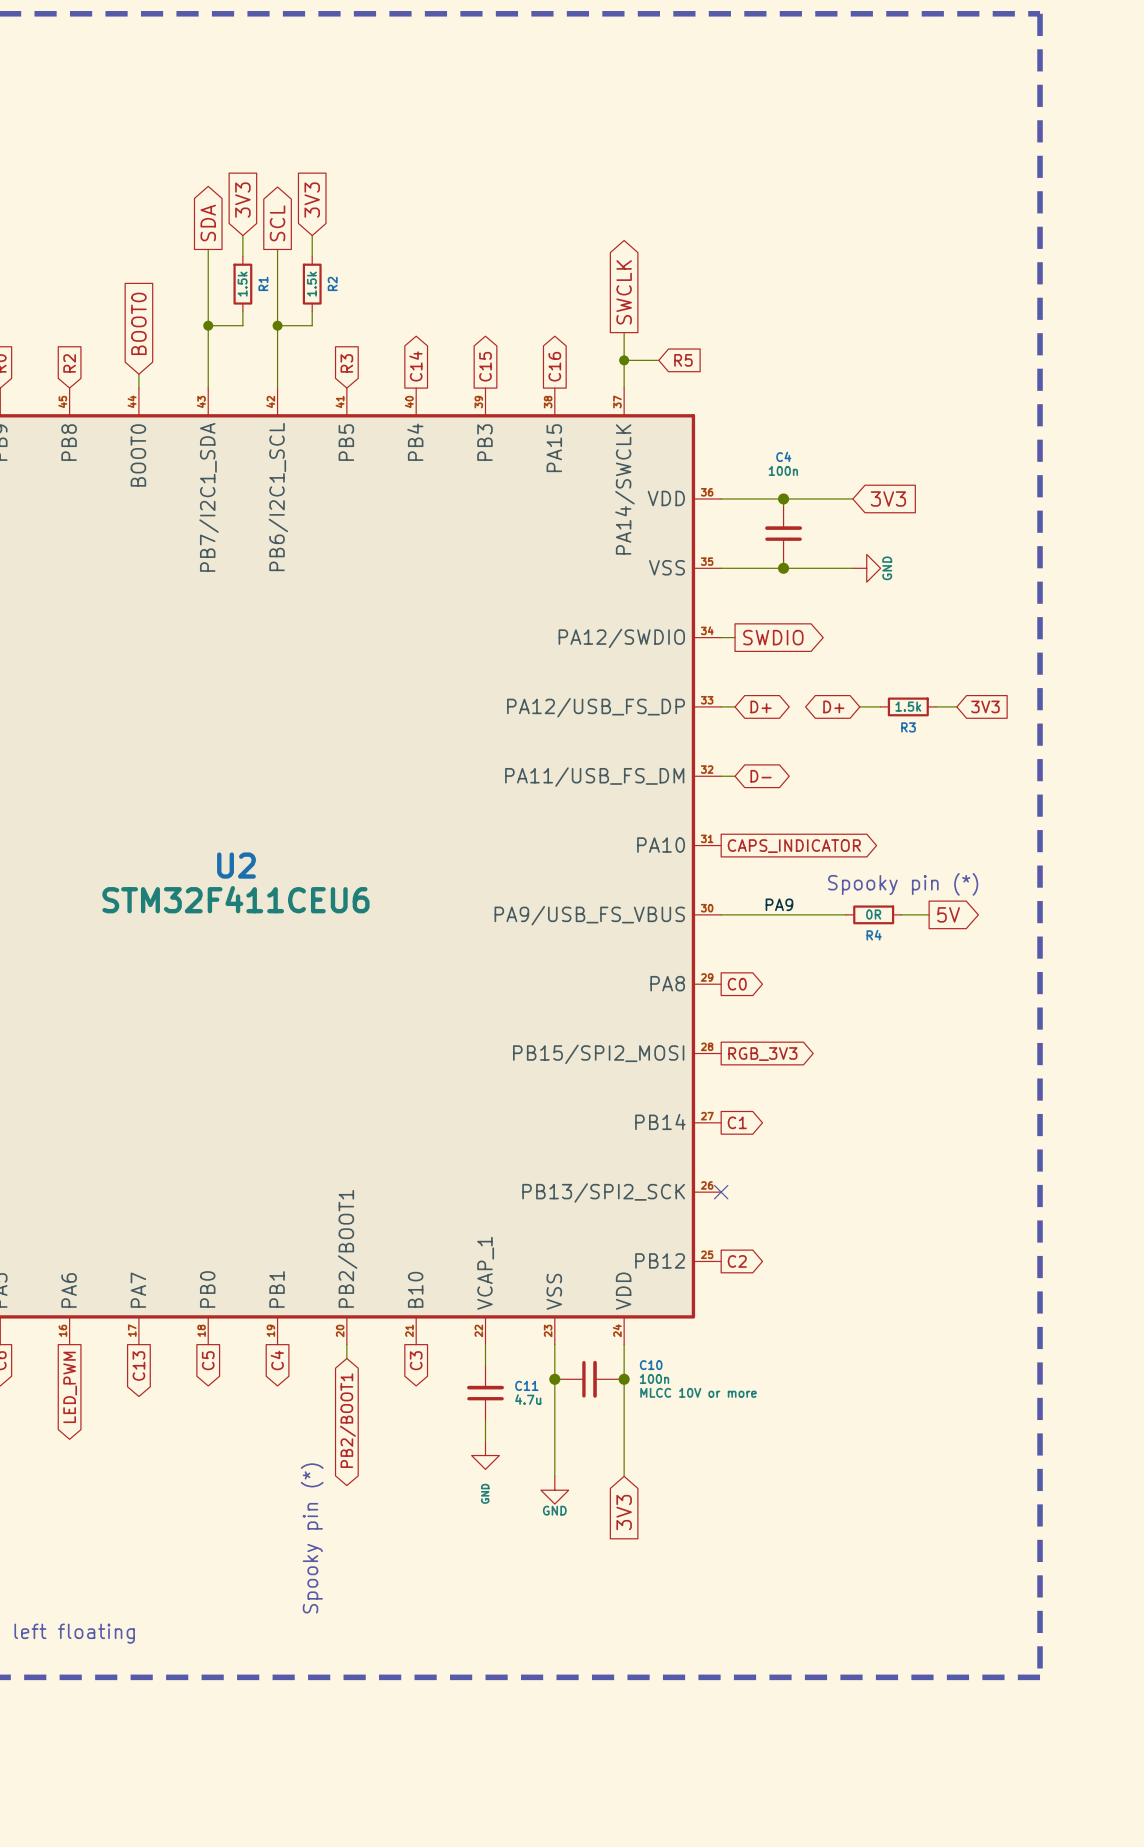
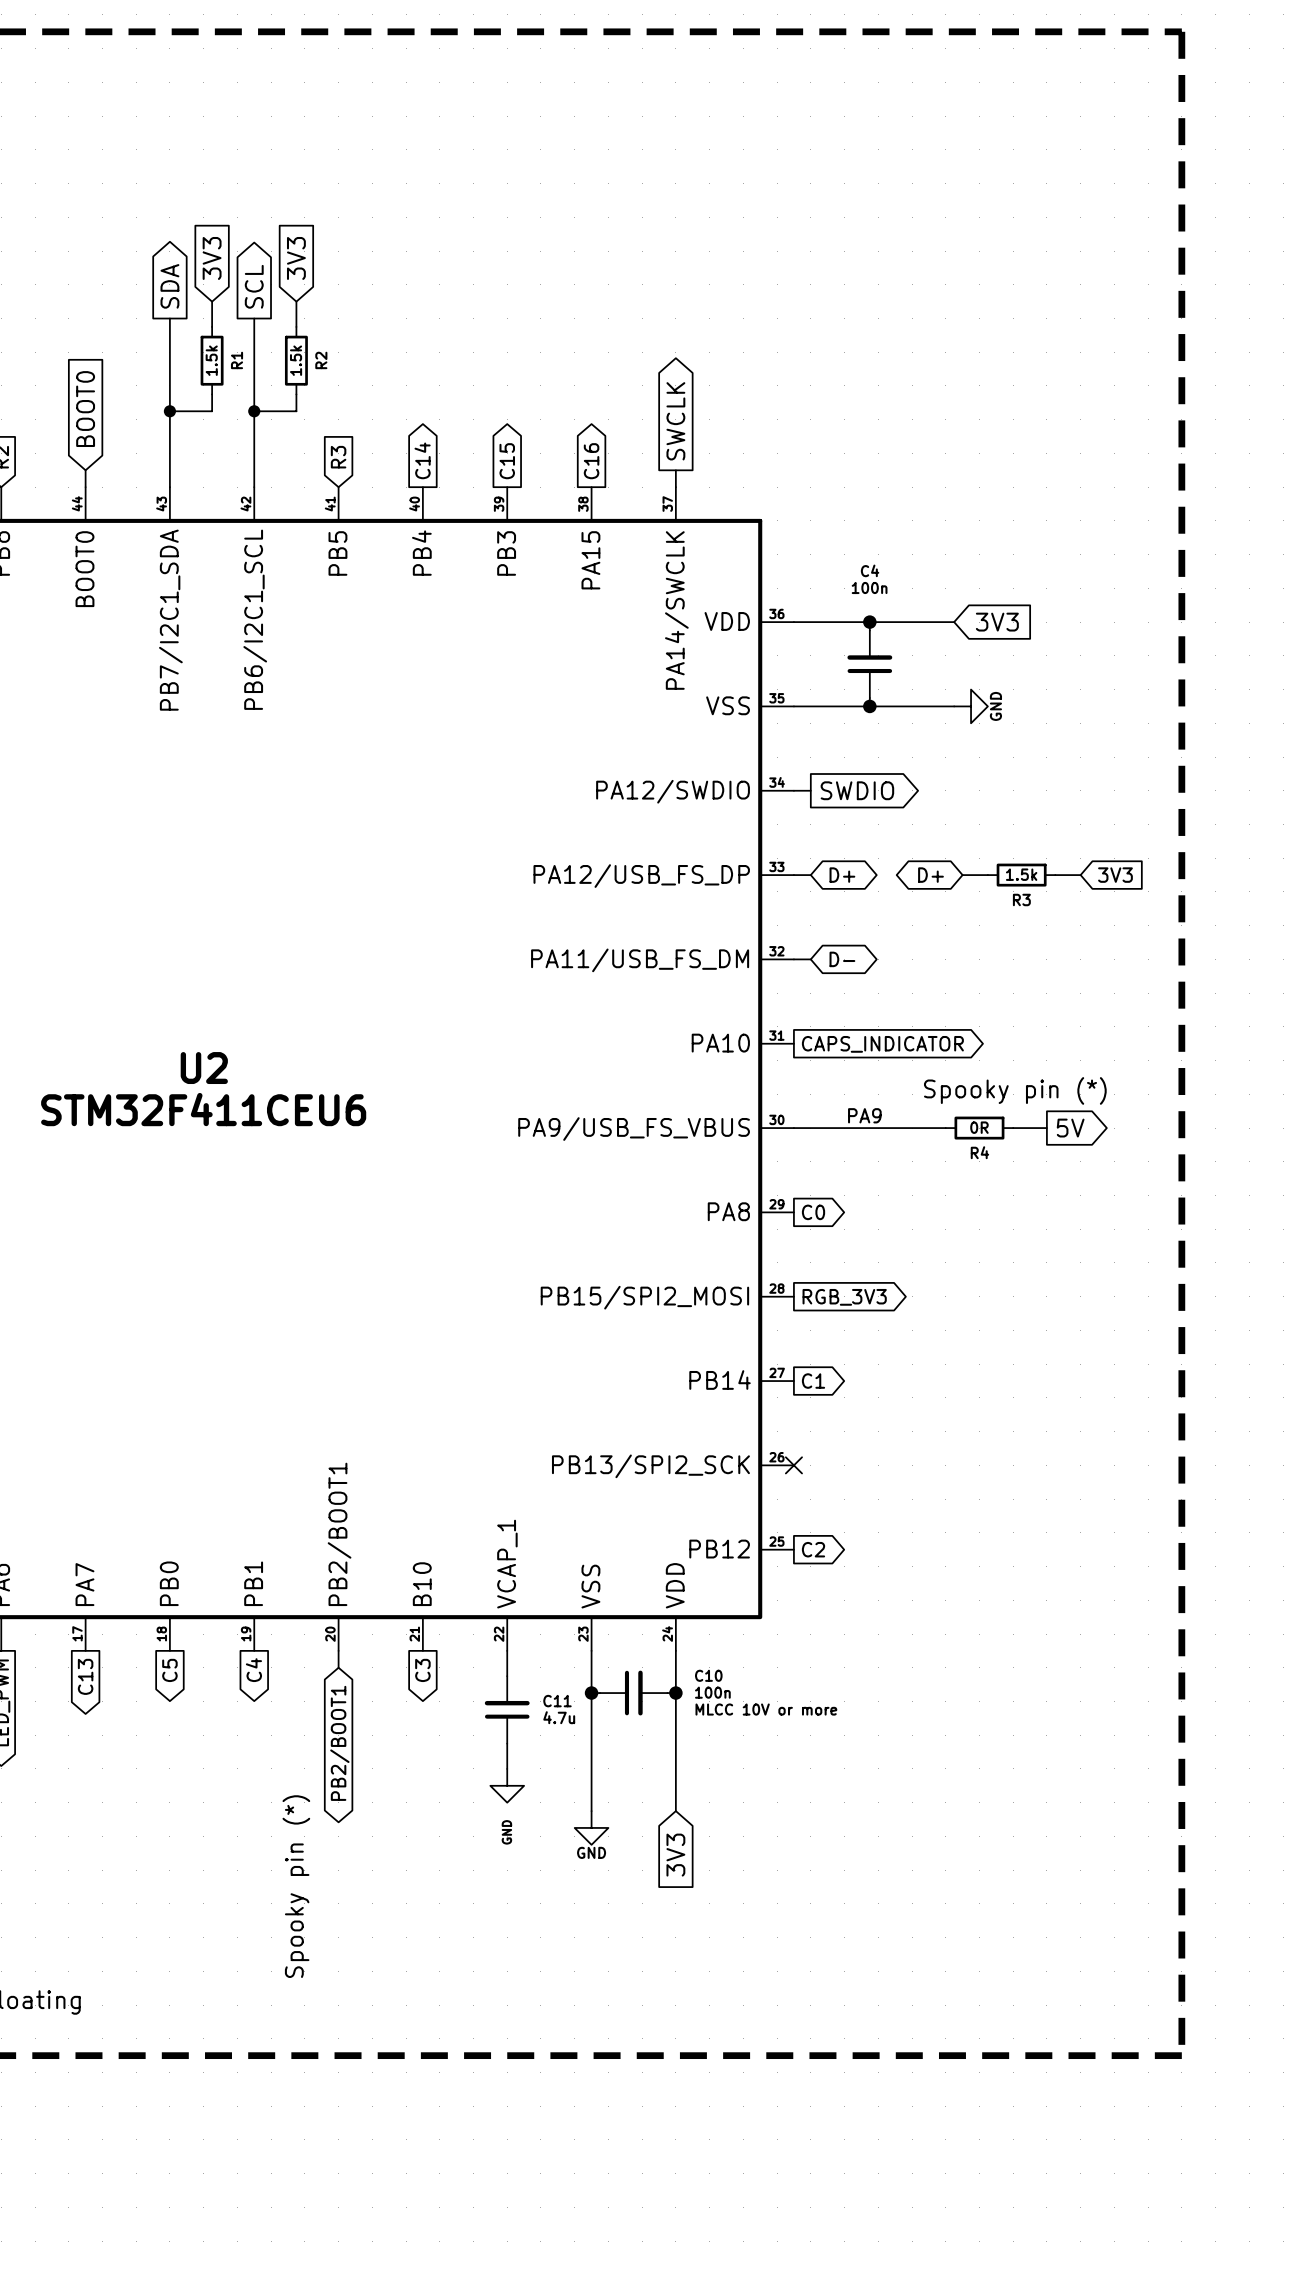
global label position: SWCLK (624, 292) -> SWCLK (675, 421)
wire: (624, 332) (624, 374) -> none
wire: (624, 360) (658, 360) -> none
junction: (624, 360) -> none
global label: R5 (683, 360) -> none

